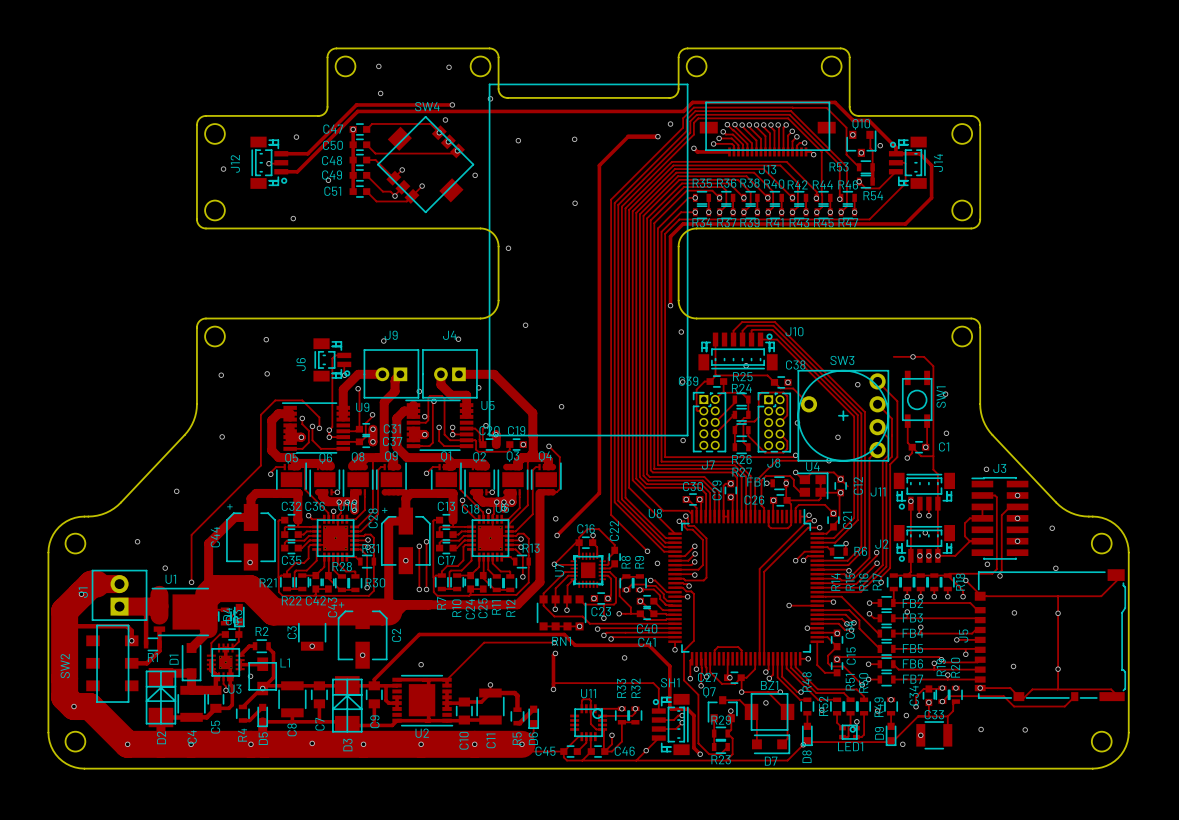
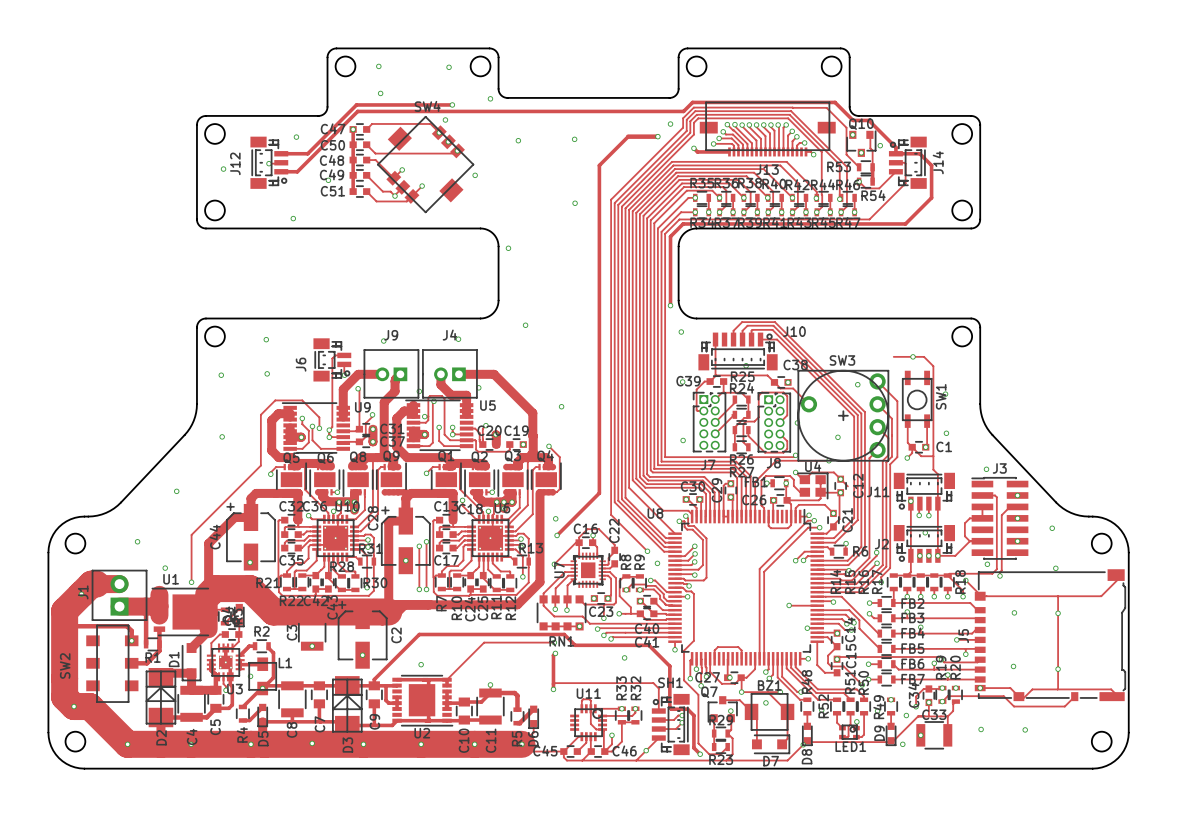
line: (489, 84) (489, 435) (687, 435) (687, 84) (489, 84) -> none

